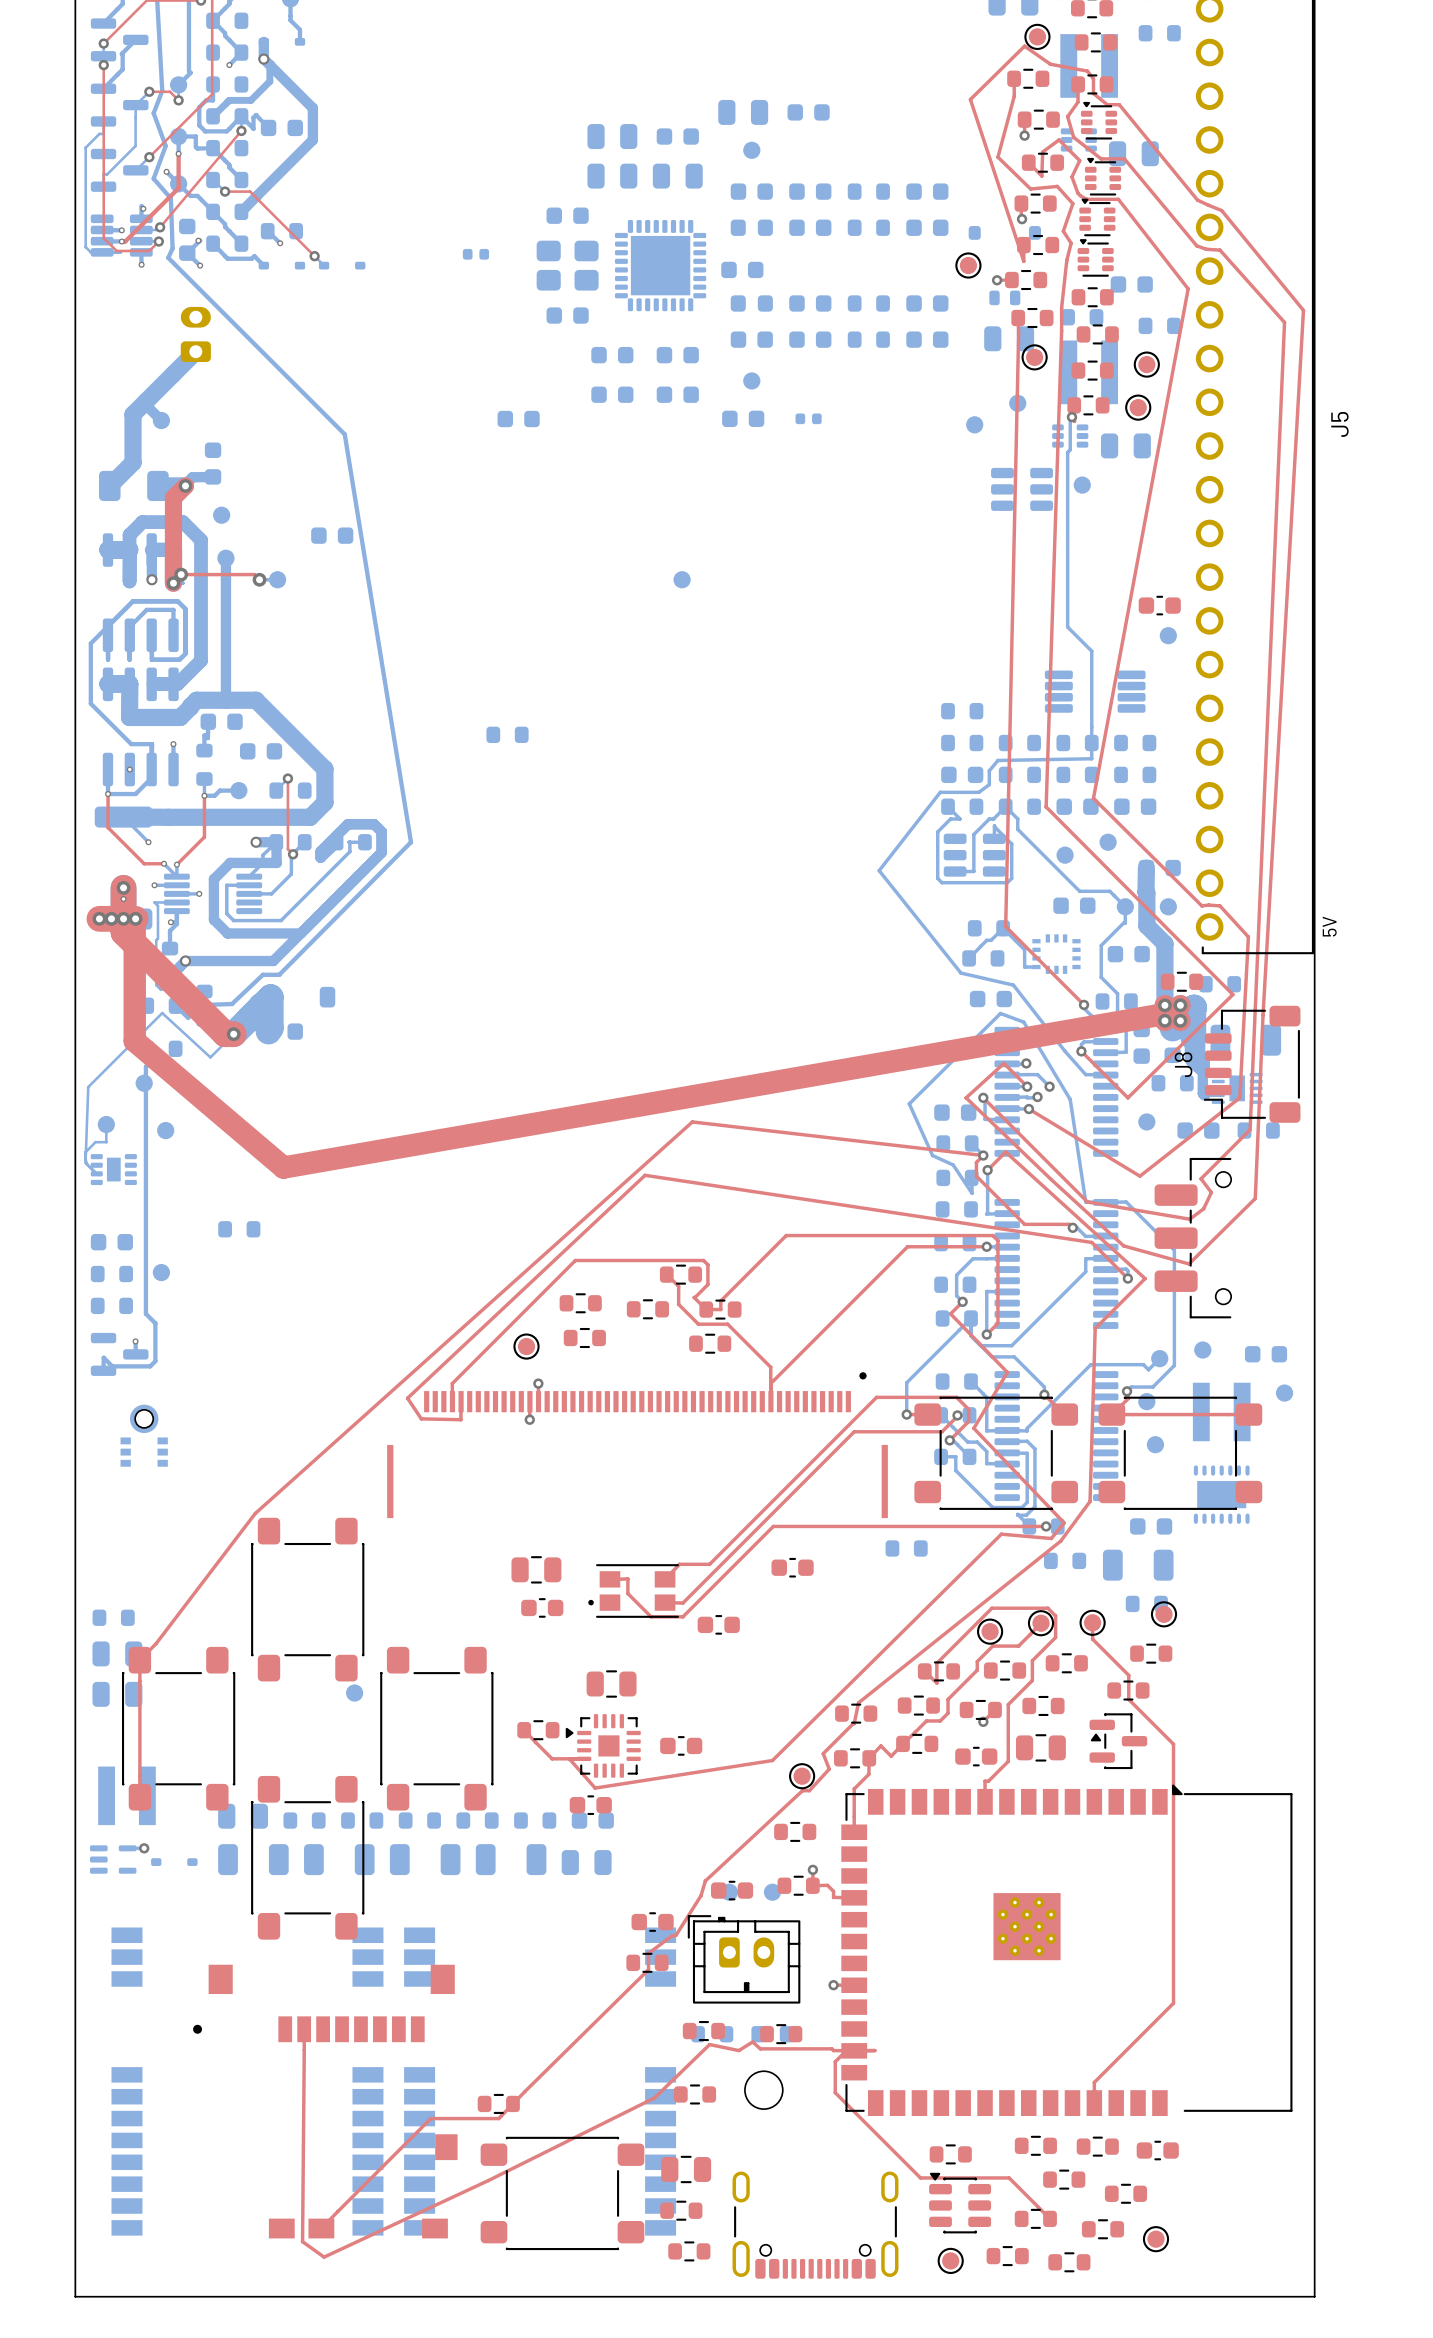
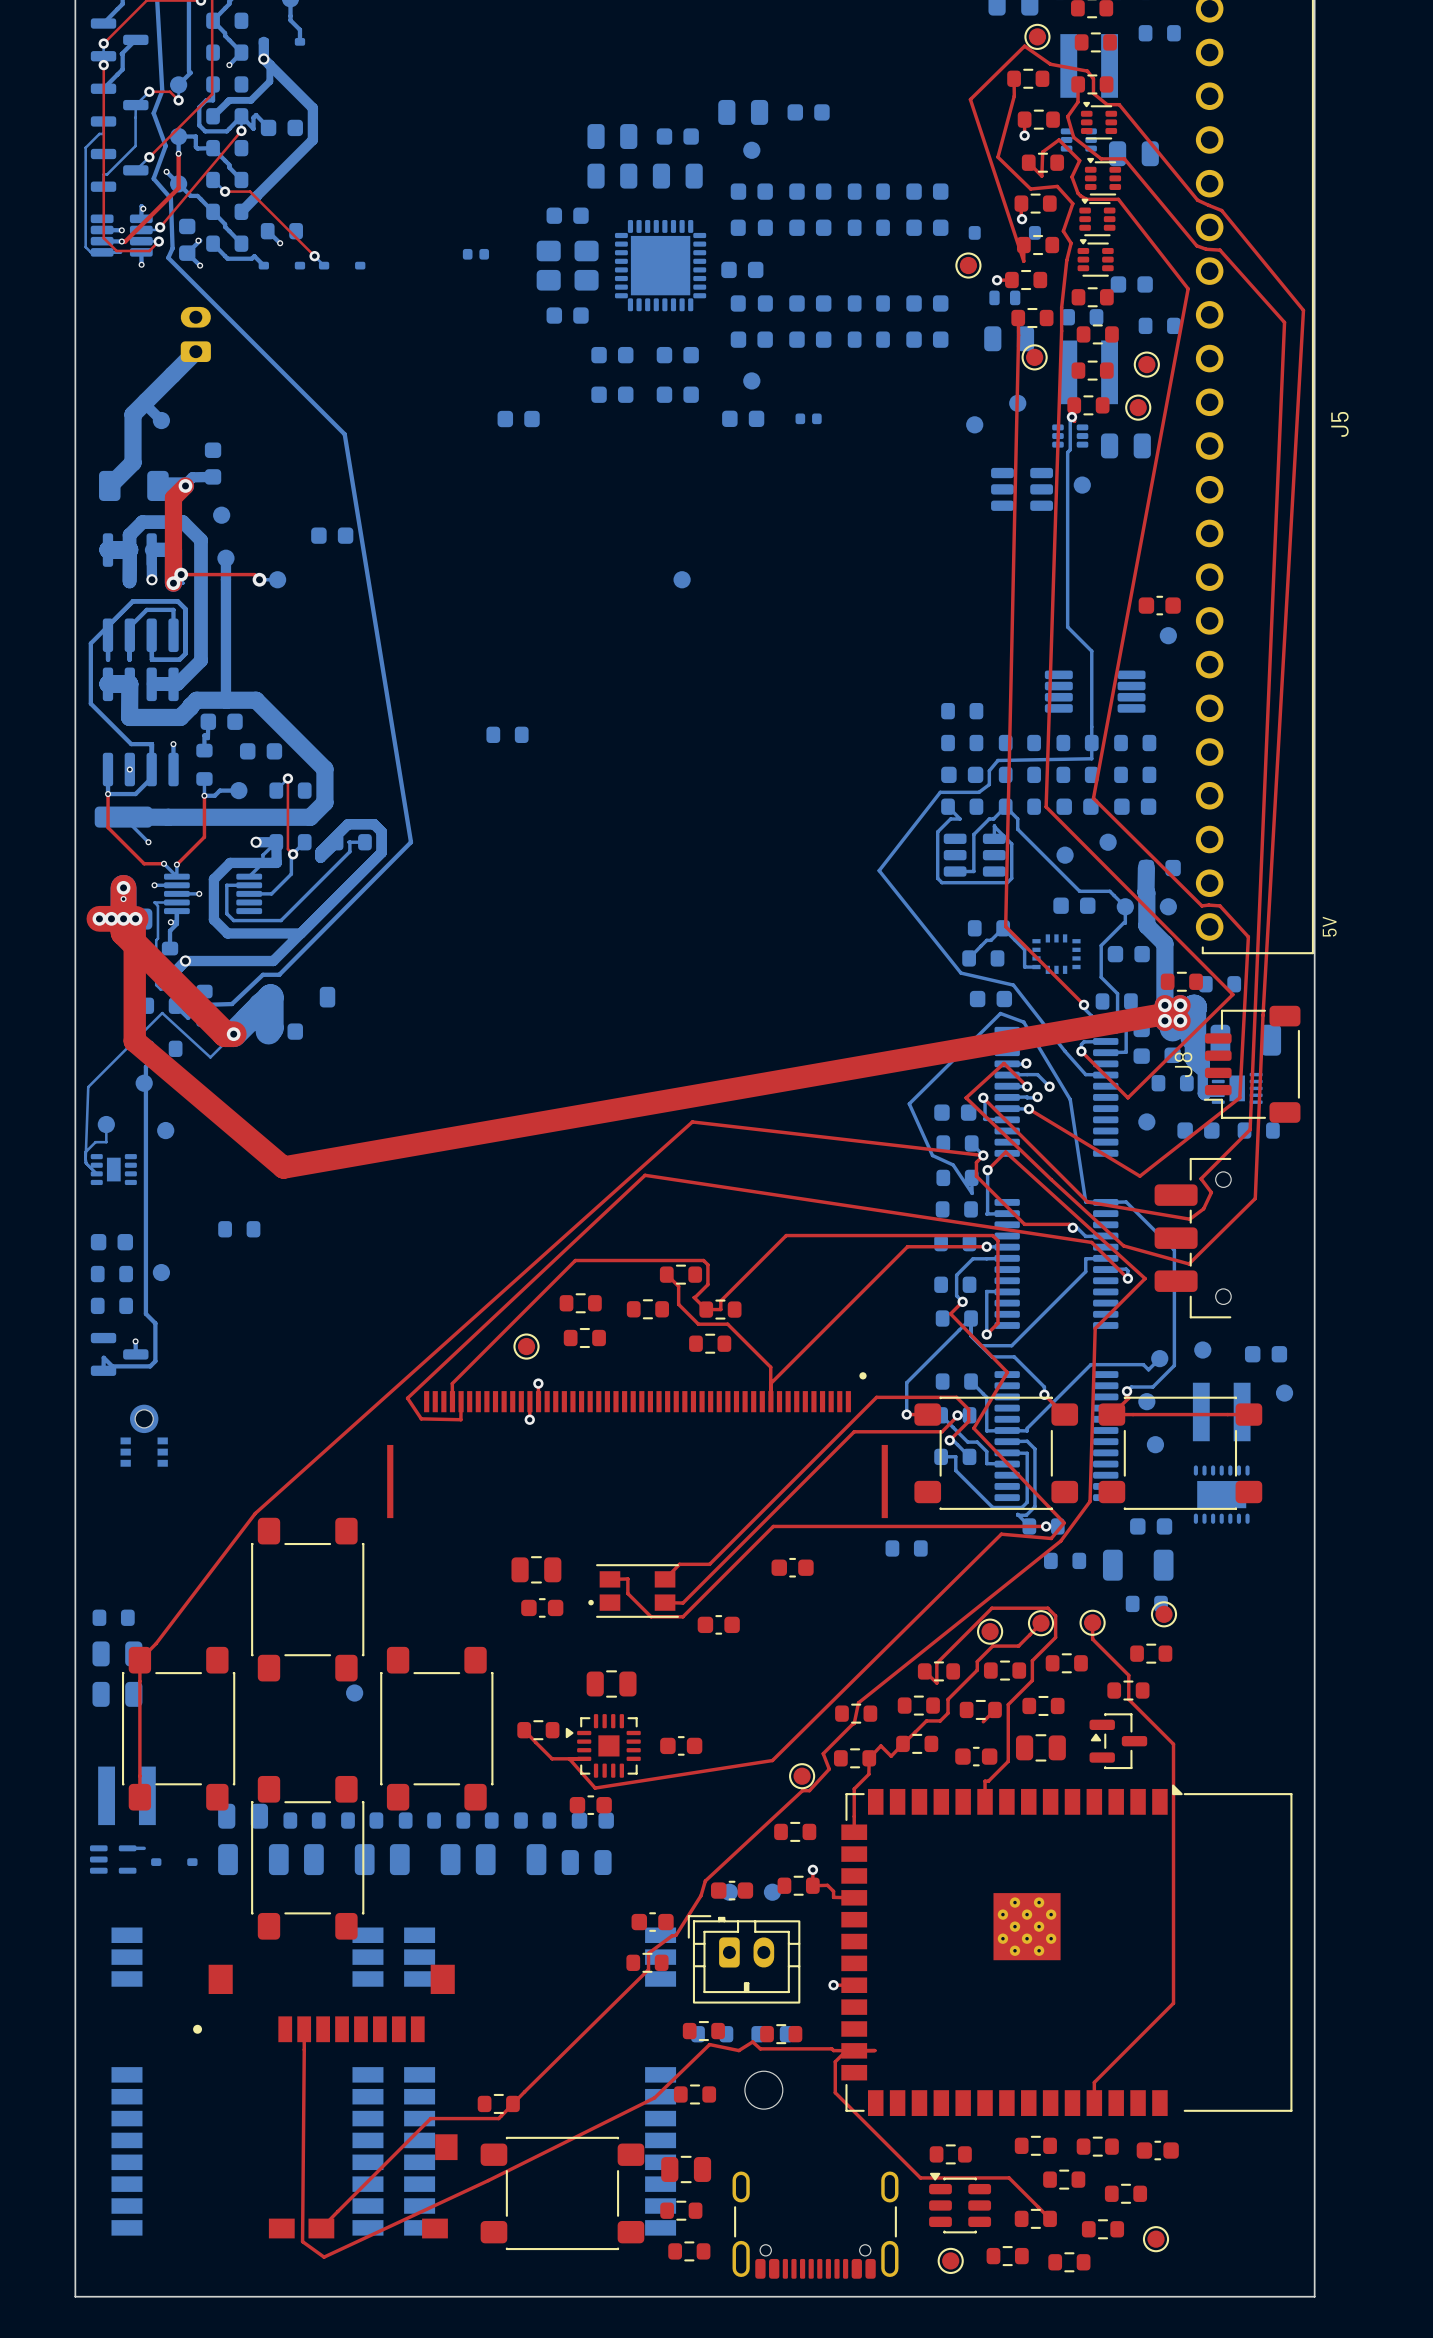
via: (983, 1721) -> none
via: (144, 1848) -> none

